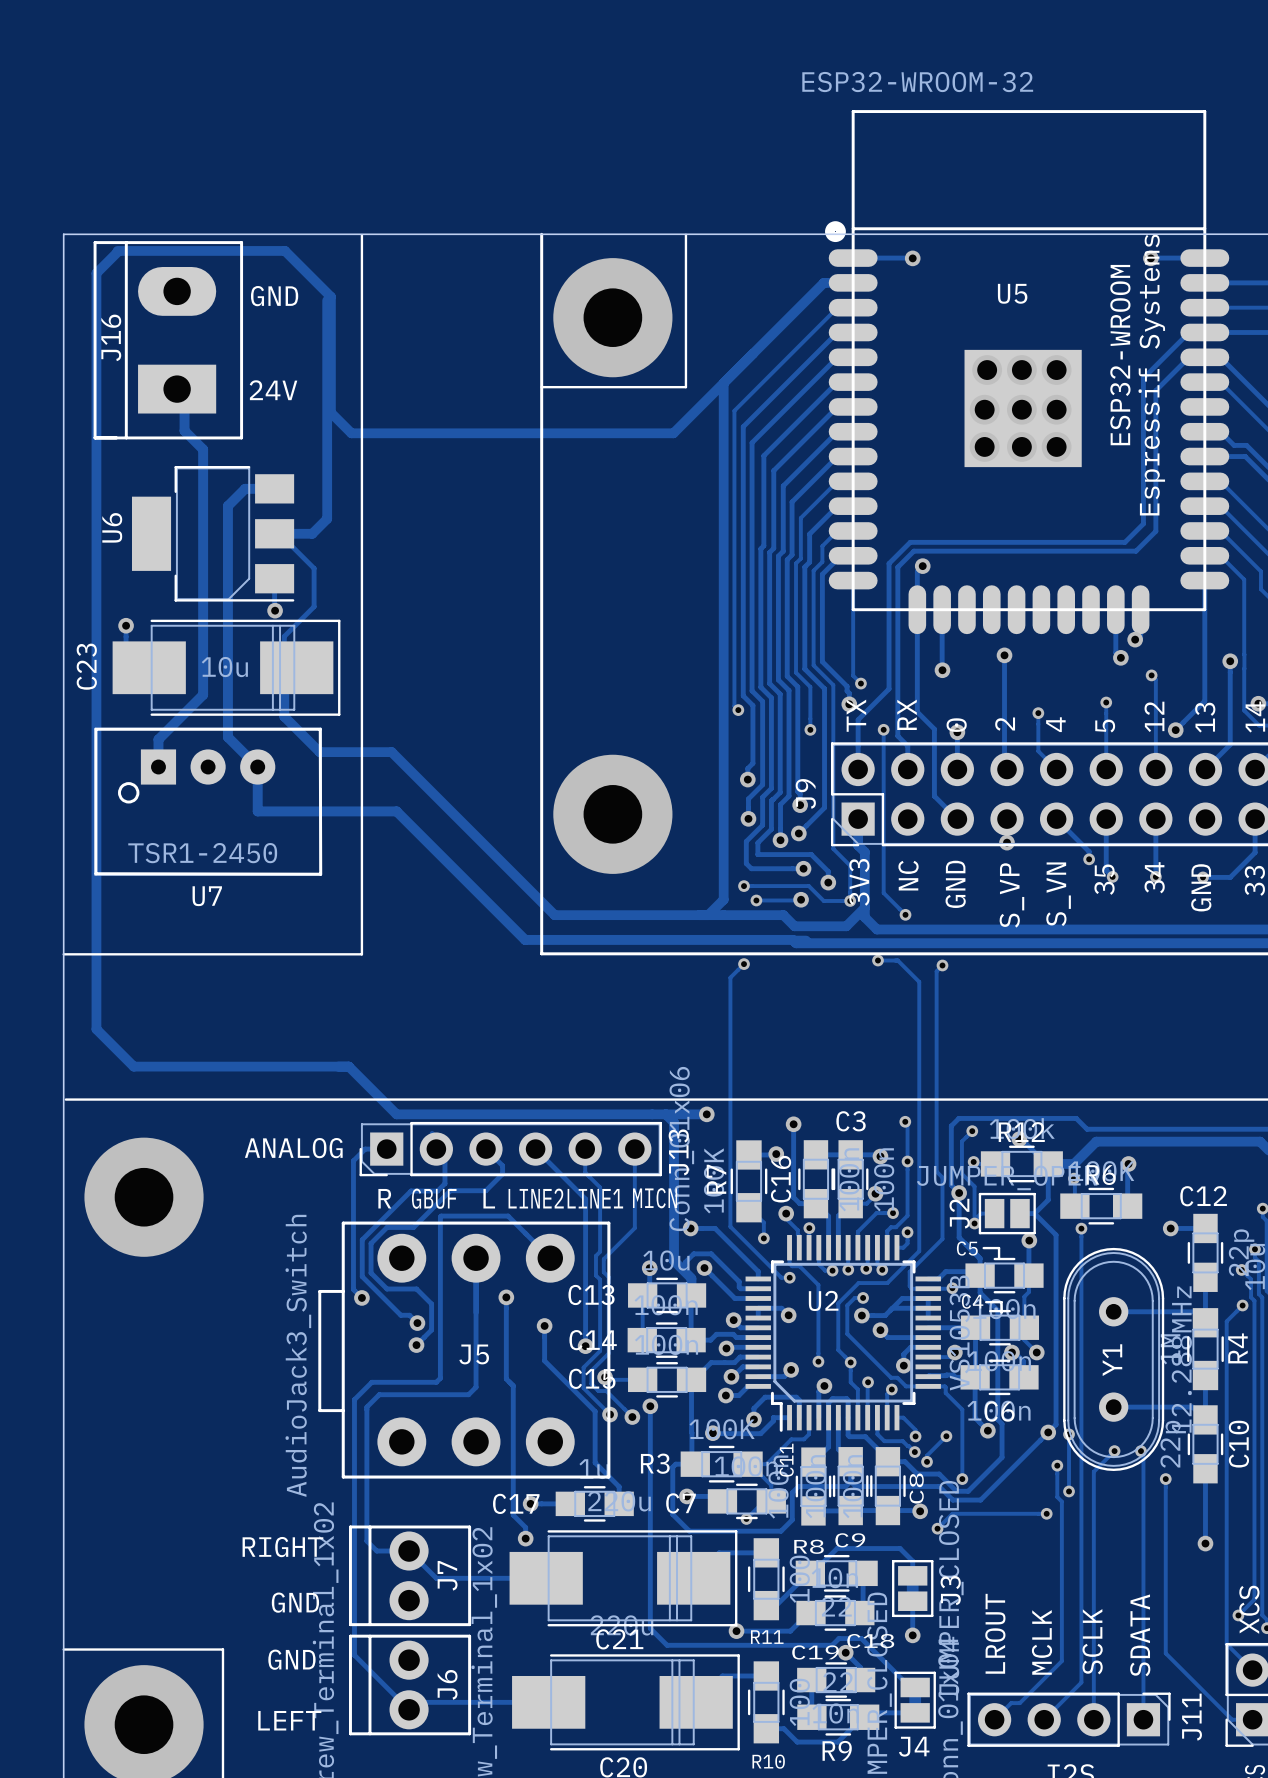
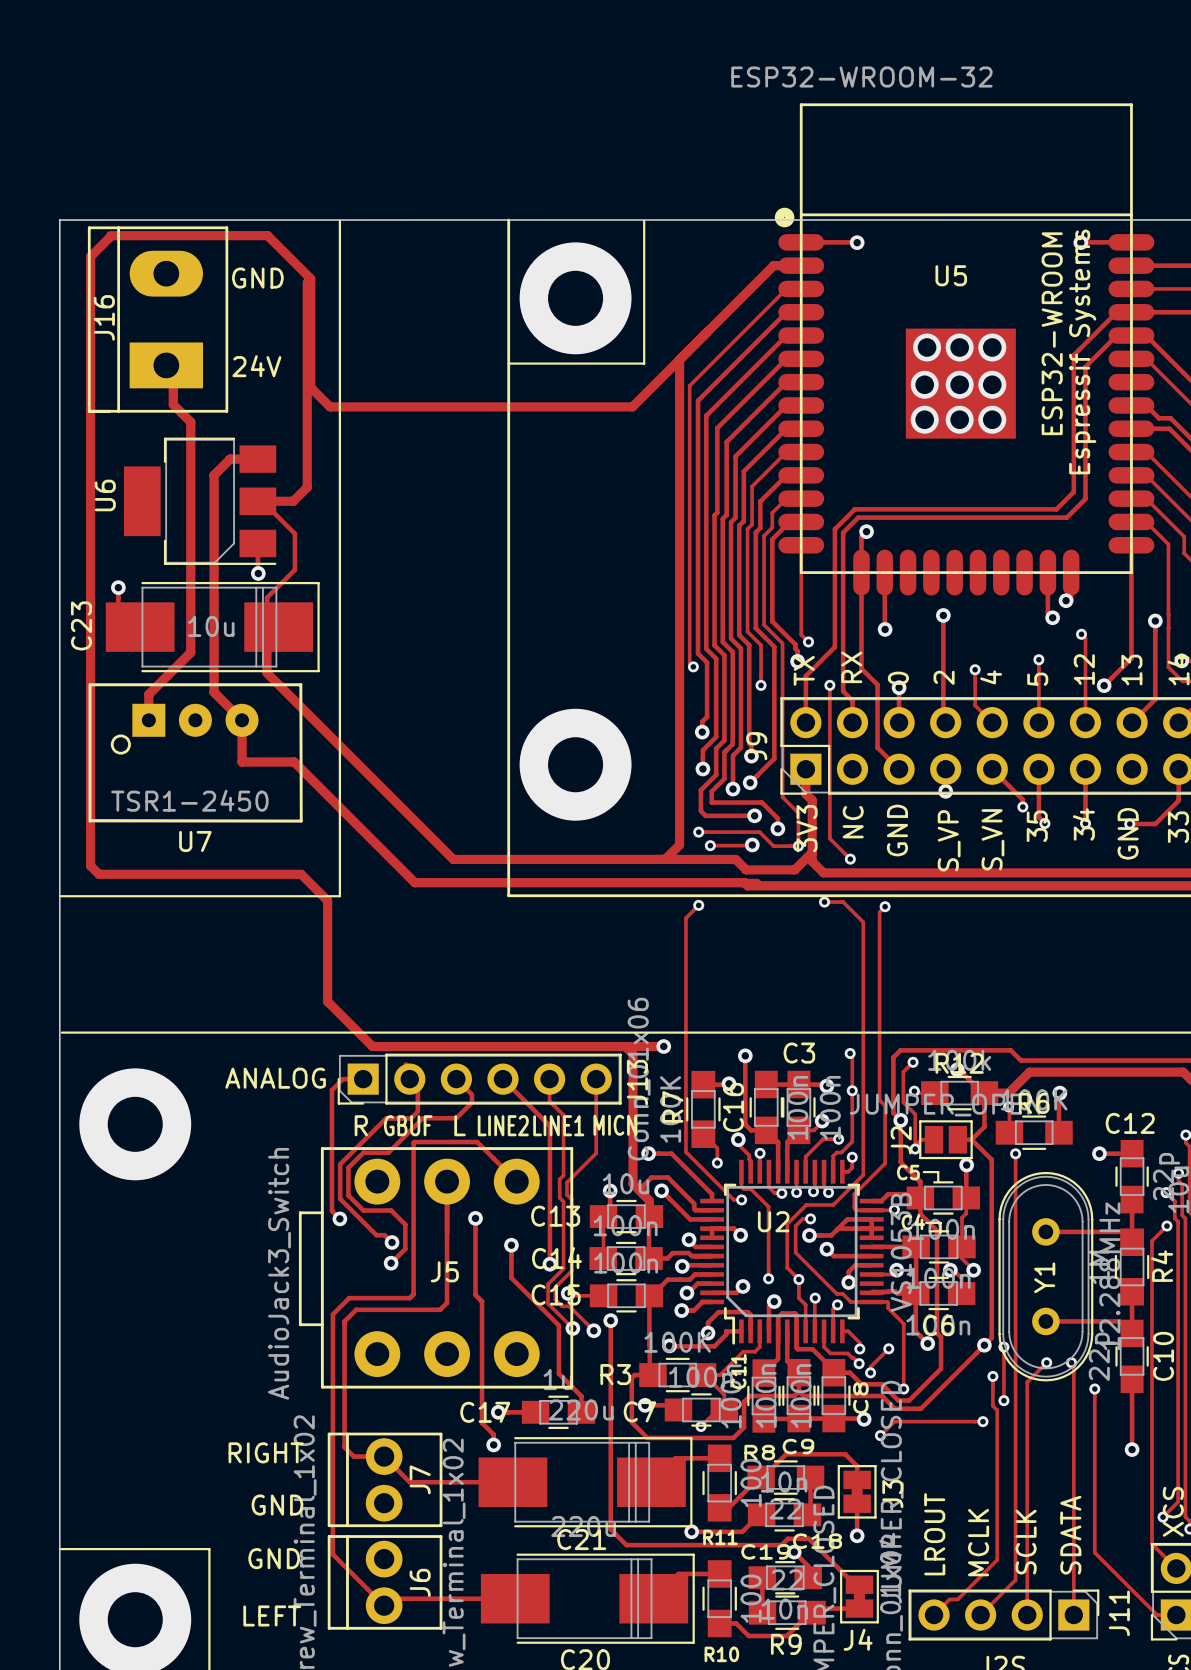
track: (319, 752) (391, 752) (554, 915) -> (300, 706) (453, 859) (520, 859)
track: (313, 811) (396, 811) (525, 939) -> (294, 762) (414, 882) (493, 882)
track: (96, 922) (96, 1029) (133, 1066) (348, 1066) -> (90, 865) (98, 874) (301, 874) (327, 900) (327, 1001)

